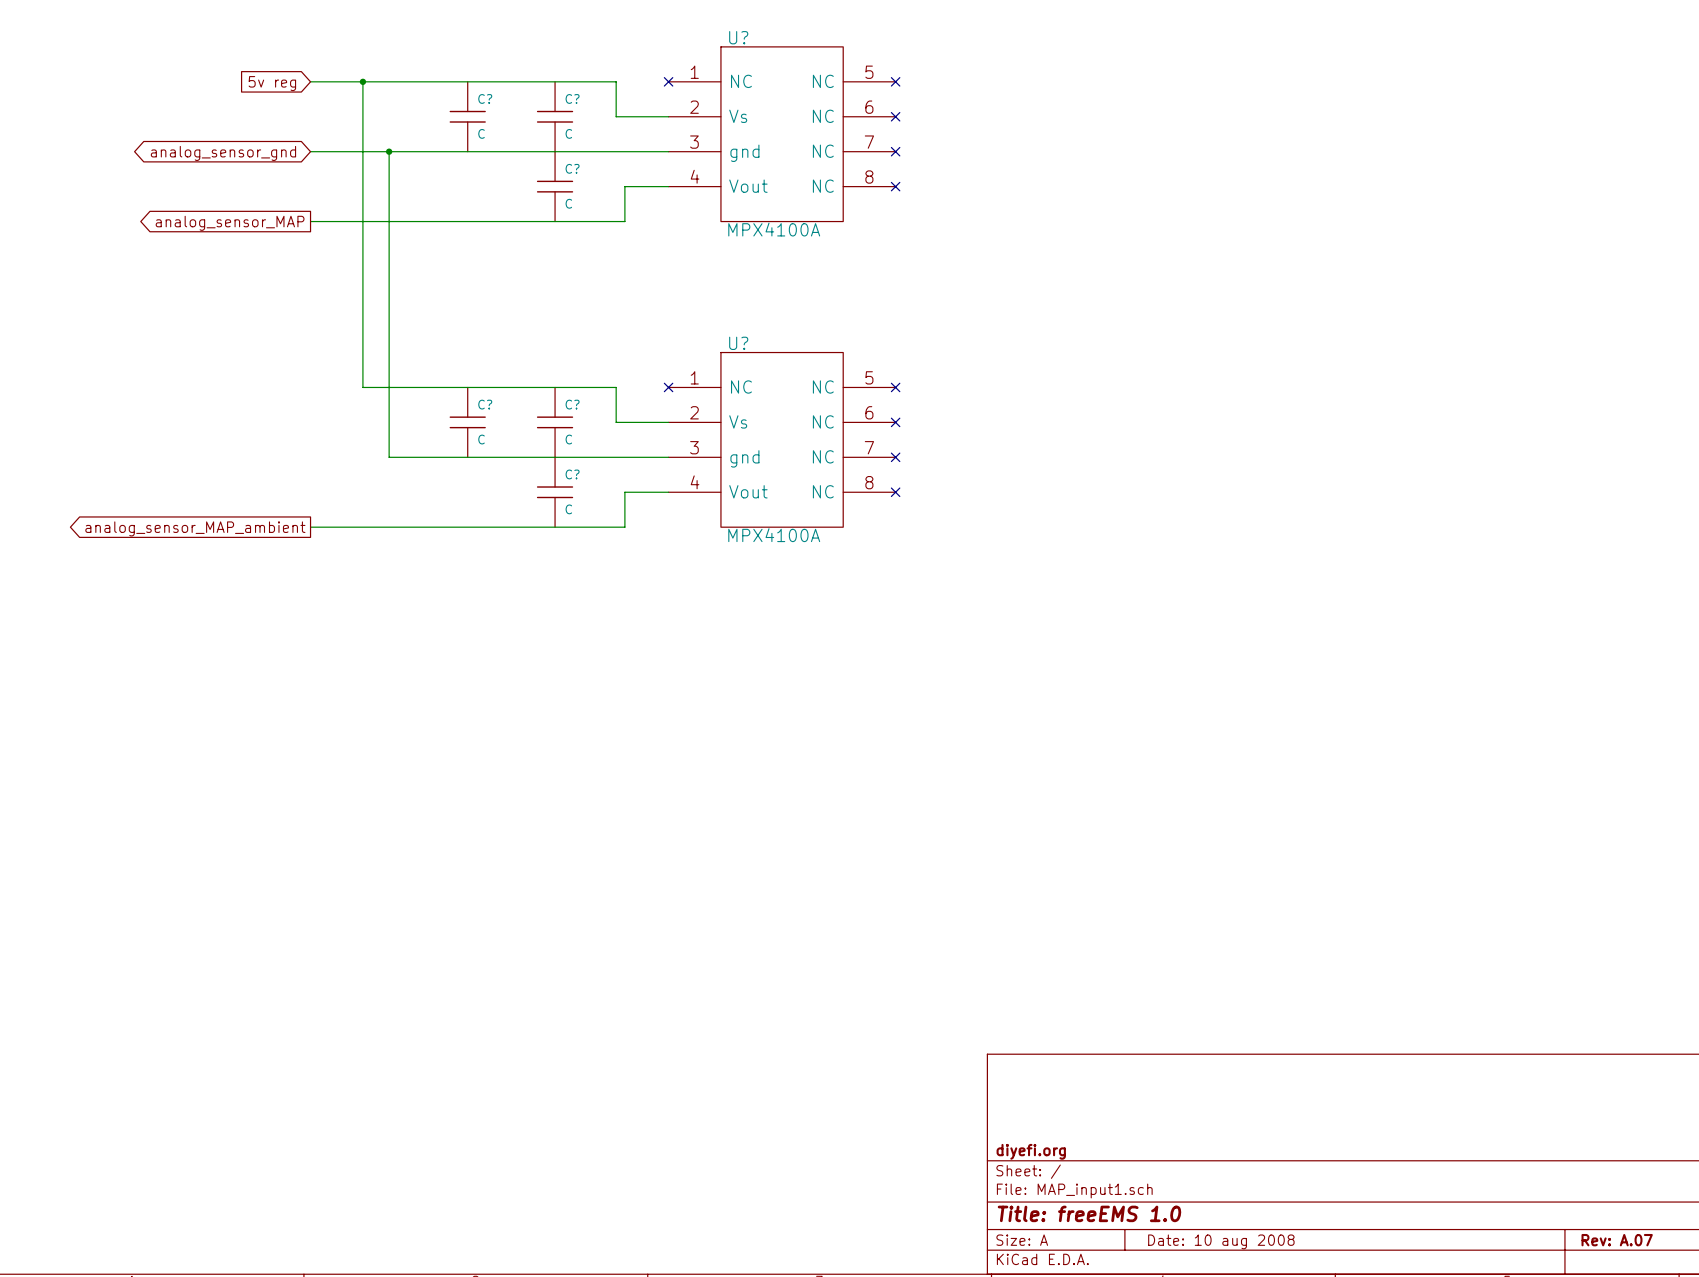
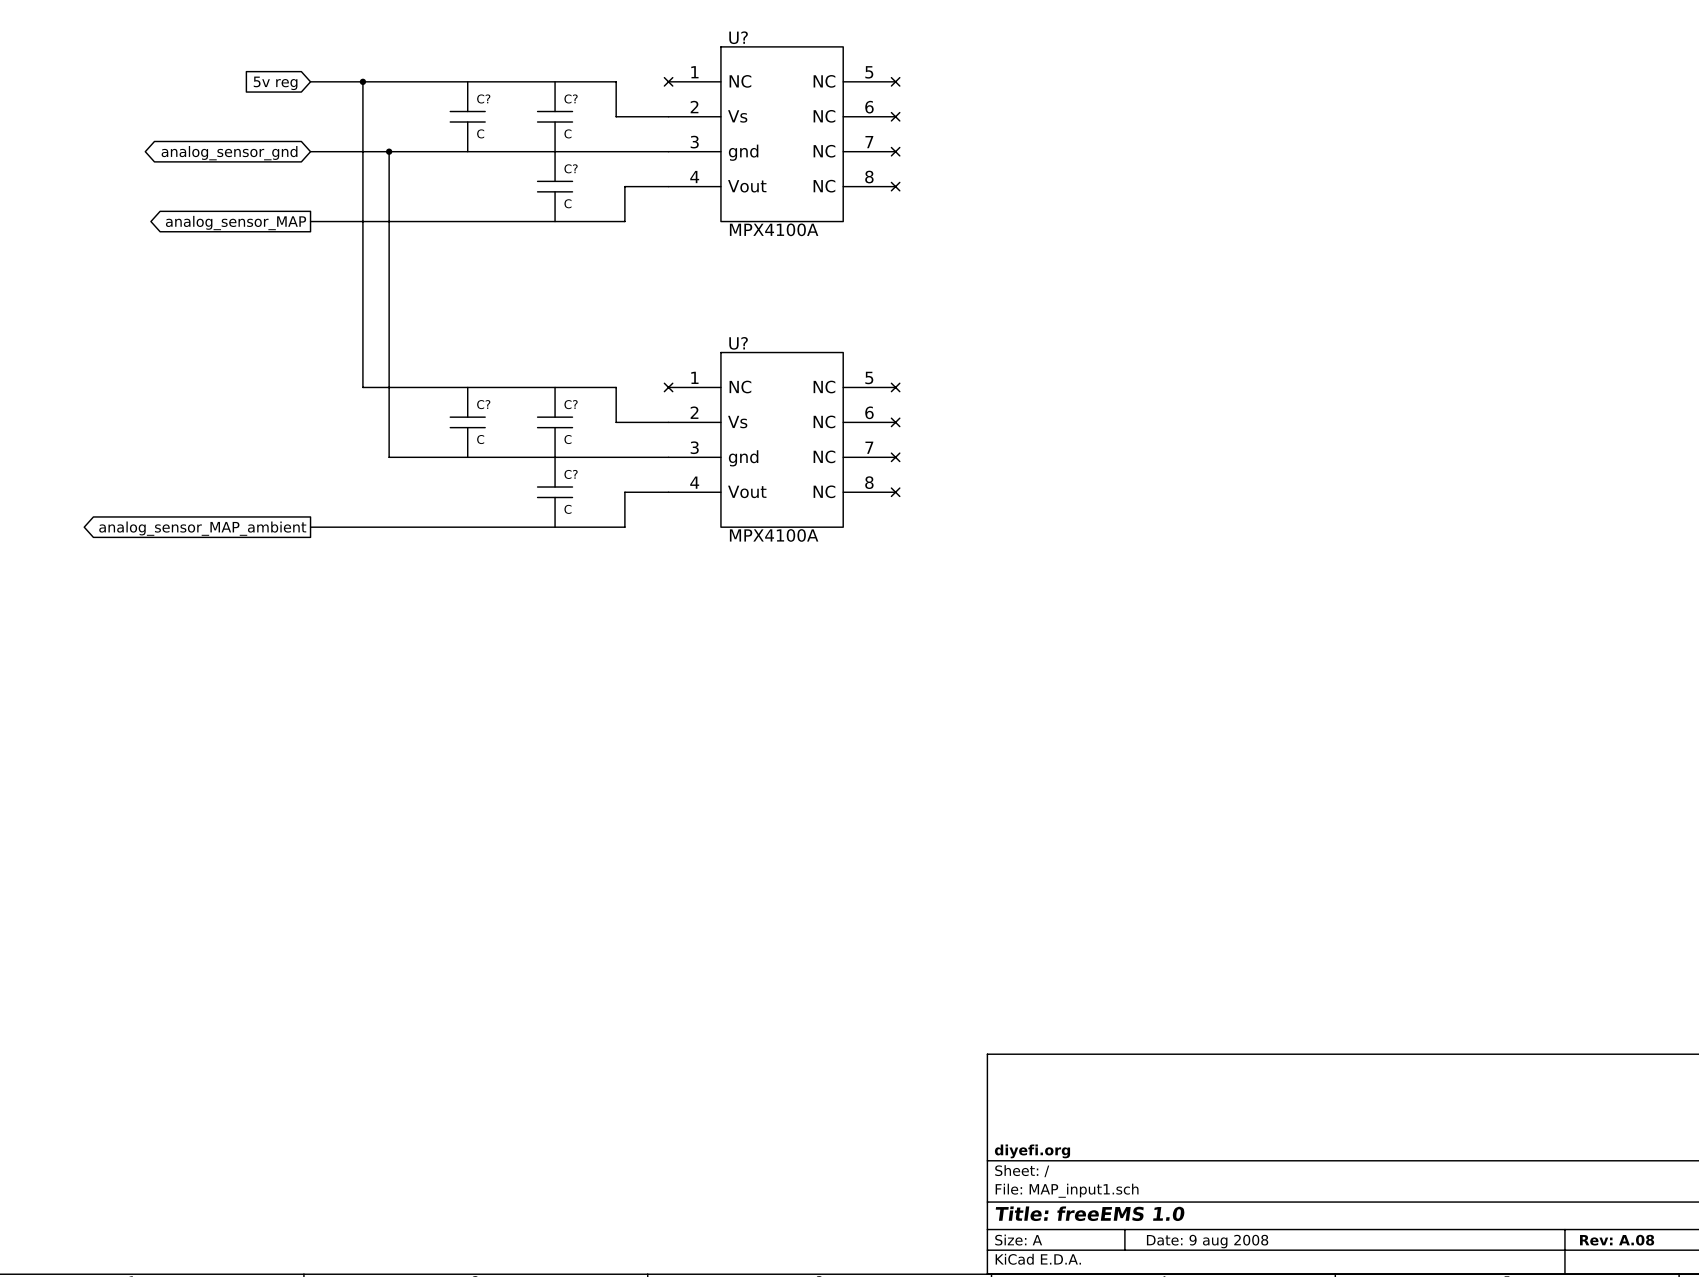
title block: Rev: A.07 (1617, 1240) -> Rev: A.08 (1617, 1240)
title block: Date: 10 aug 2008 (1221, 1241) -> Date: 9 aug 2008 (1207, 1241)

